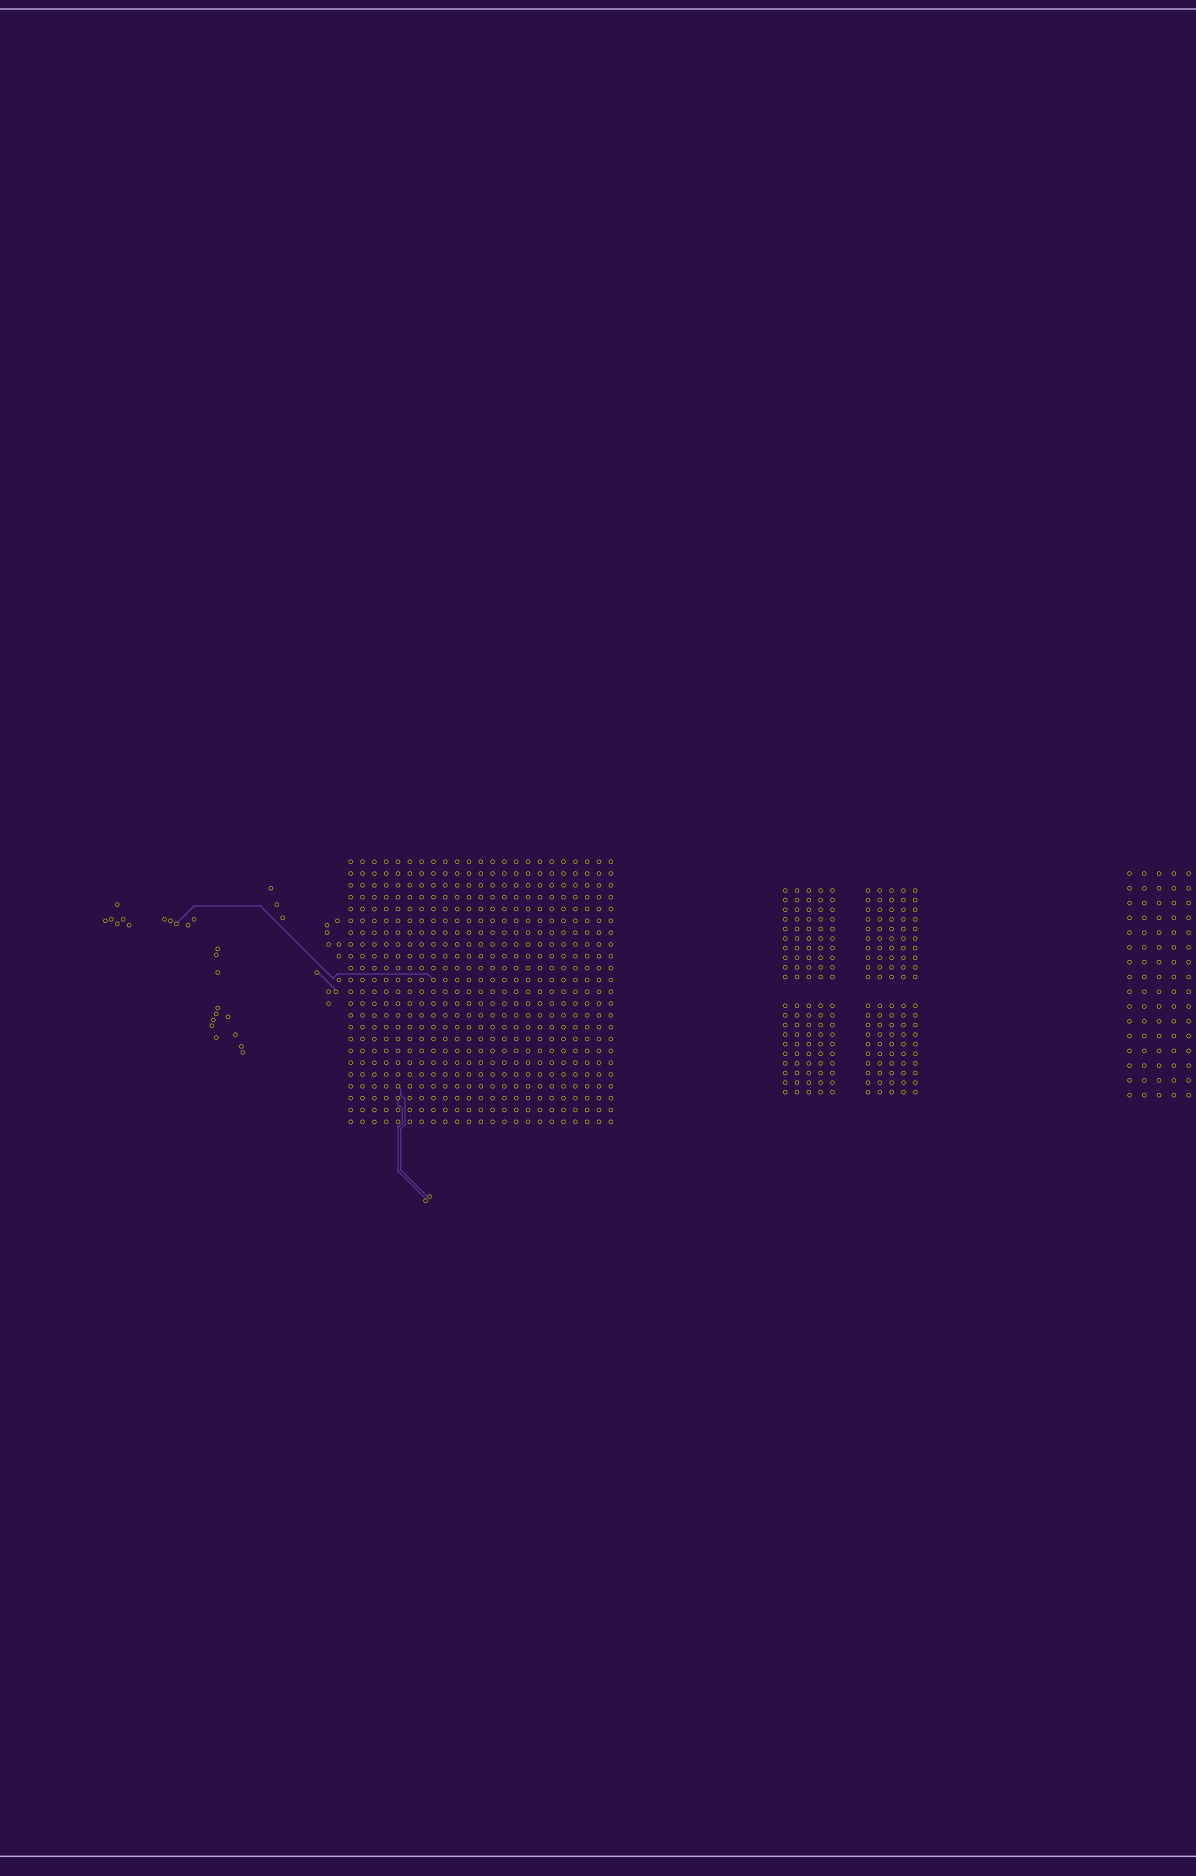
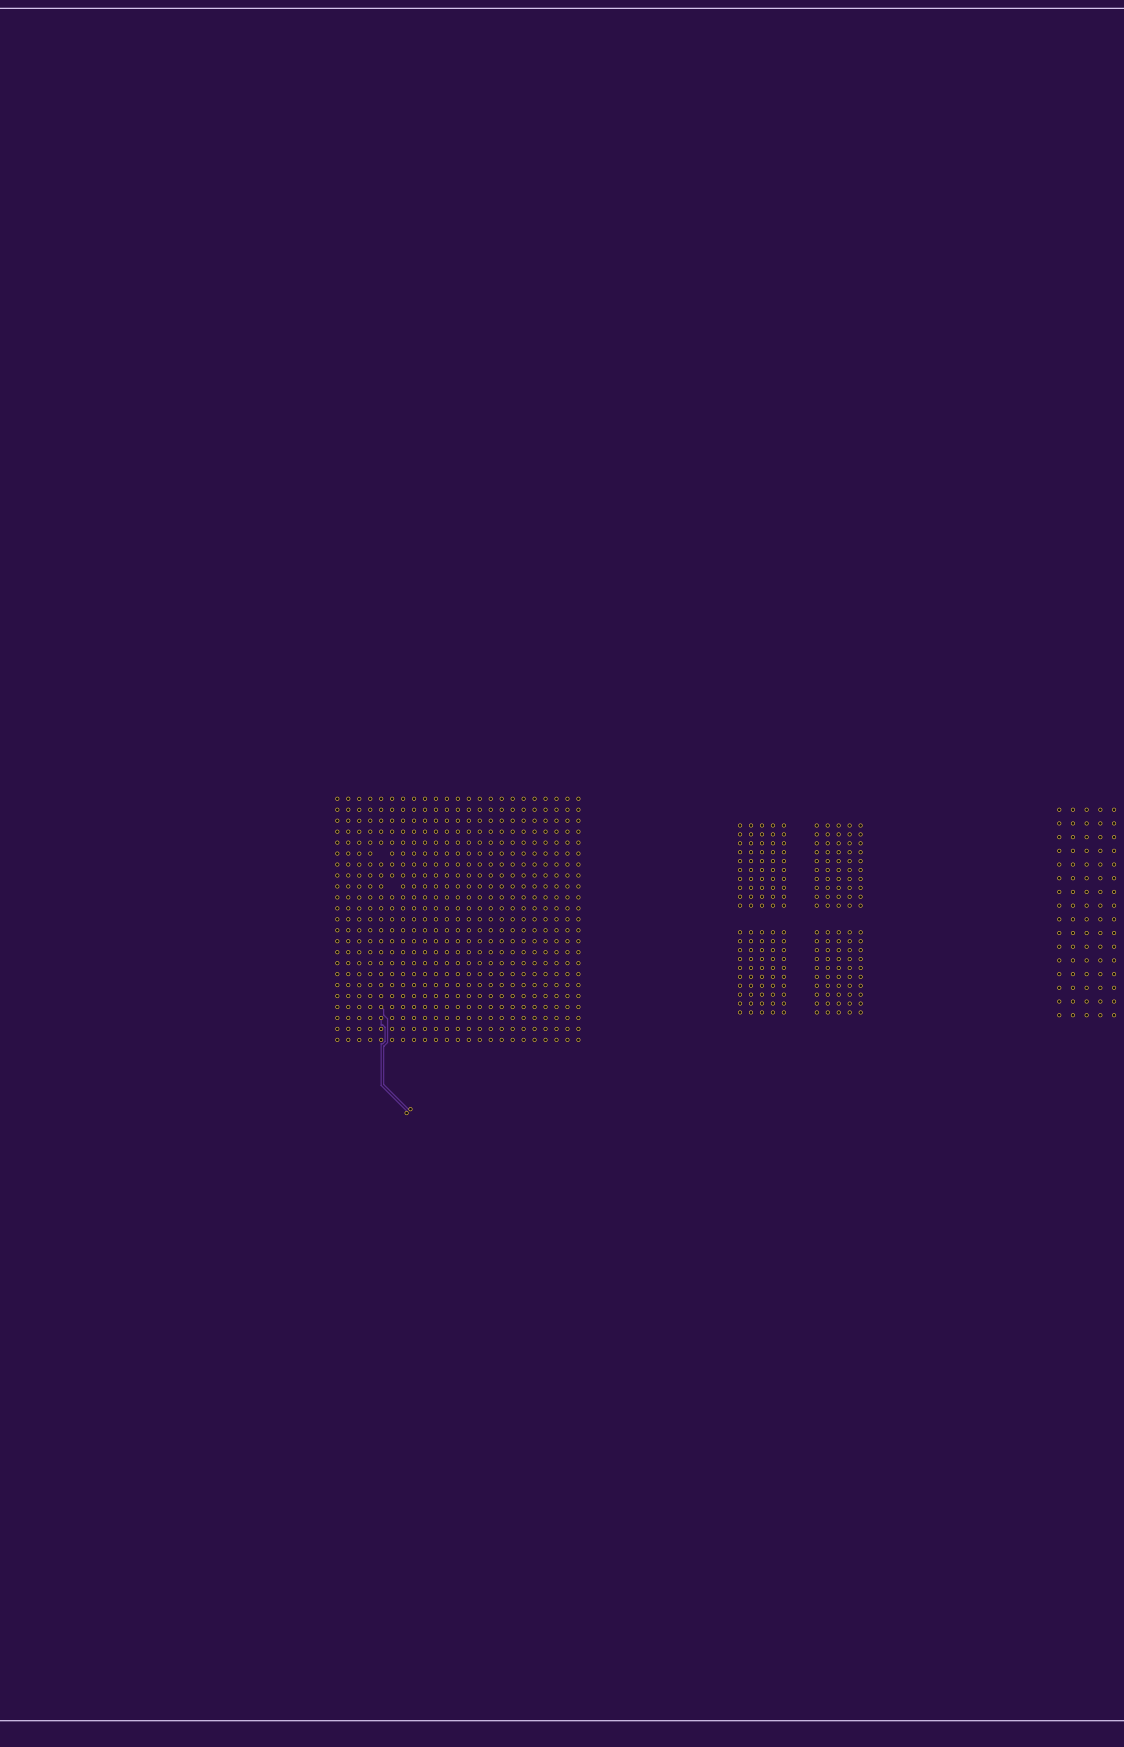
via: (270, 888) -> none
via: (117, 904) -> none
via: (276, 904) -> none
via: (282, 917) -> none
via: (111, 919) -> none
via: (123, 919) -> none
via: (164, 919) -> none
via: (194, 919) -> none
via: (105, 920) -> none
via: (170, 920) -> none
via: (337, 920) -> none
via: (398, 920) -> none
via: (117, 923) -> none
track: (176, 923) (194, 906) (260, 906) (332, 978) -> none
via: (176, 923) -> none
via: (129, 925) -> none
via: (188, 925) -> none
via: (327, 925) -> none
via: (327, 932) -> none
via: (328, 944) -> none
via: (338, 944) -> none
via: (217, 948) -> none
via: (216, 954) -> none
via: (338, 956) -> none
via: (409, 956) -> none
via: (217, 972) -> none
track: (316, 972) (335, 991) -> none
via: (316, 972) -> none
track: (333, 978) (337, 974) (427, 974) (433, 979) -> none
via: (338, 979) -> none
via: (328, 991) -> none
via: (335, 991) -> none
via: (328, 1003) -> none
via: (217, 1008) -> none
via: (216, 1013) -> none
via: (228, 1016) -> none
via: (213, 1019) -> none
via: (211, 1025) -> none
via: (235, 1034) -> none
via: (216, 1037) -> none
via: (241, 1046) -> none
via: (242, 1052) -> none

